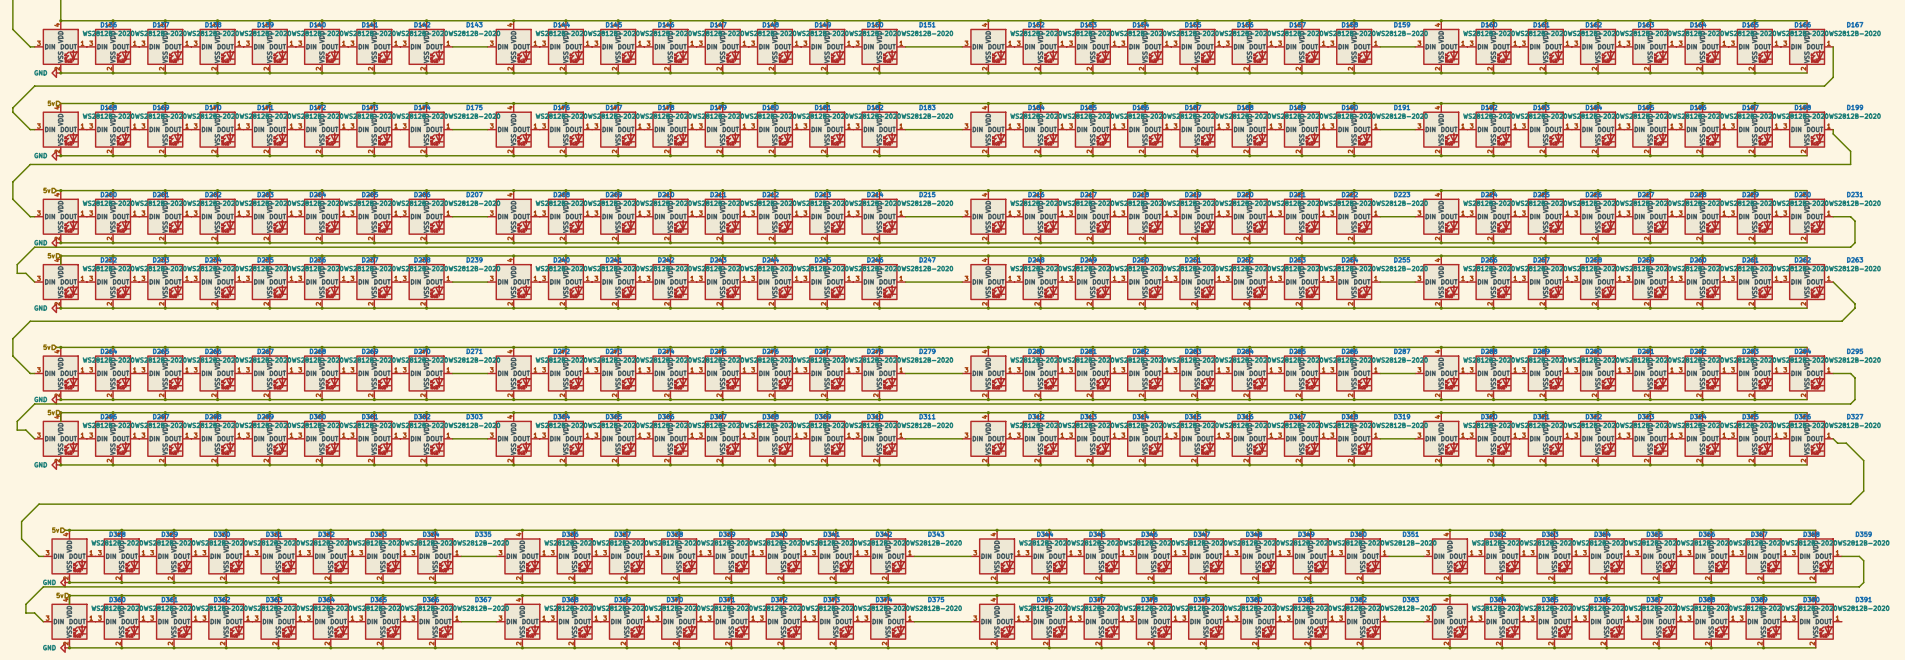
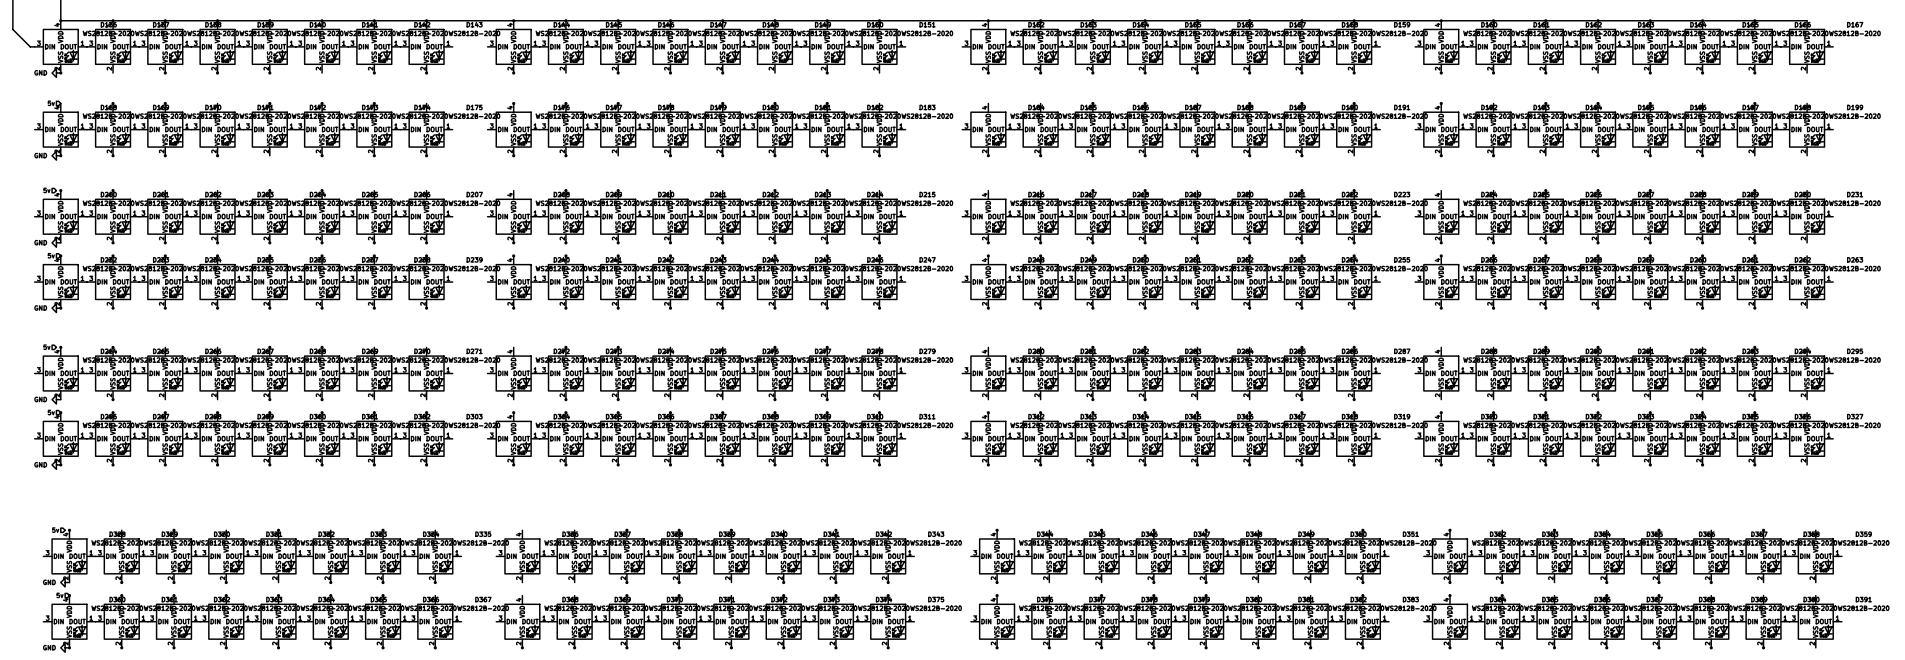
wire: (452, 46) (487, 46) -> none
wire: (905, 46) (962, 46) -> none
wire: (1380, 46) (1415, 46) -> none
wire: (1833, 46) (1833, 77) (1824, 86) (34, 86) (12, 107) (12, 112) (30, 129) (34, 129) -> none
wire: (60, 73) (1807, 73) -> none
junction: (879, 73) -> none
wire: (60, 103) (1807, 103) -> none
junction: (217, 103) -> none
junction: (426, 103) -> none
junction: (670, 103) -> none
junction: (879, 103) -> none
junction: (988, 103) -> none
junction: (1040, 103) -> none
junction: (1197, 103) -> none
junction: (1493, 103) -> none
junction: (1702, 103) -> none
wire: (452, 129) (487, 129) -> none
wire: (905, 129) (962, 129) -> none
wire: (1380, 129) (1415, 129) -> none
wire: (1833, 129) (1833, 133) (1850, 151) (1850, 164) (30, 164) (12, 181) (12, 199) (30, 216) (34, 216) -> none
wire: (60, 155) (1807, 155) -> none
junction: (269, 155) -> none
junction: (618, 155) -> none
junction: (1354, 155) -> none
junction: (1545, 155) -> none
junction: (1754, 155) -> none
wire: (56, 190) (1807, 190) -> none
junction: (165, 190) -> none
junction: (217, 190) -> none
junction: (374, 190) -> none
junction: (426, 190) -> none
junction: (513, 190) -> none
junction: (670, 190) -> none
junction: (722, 190) -> none
junction: (879, 190) -> none
junction: (988, 190) -> none
junction: (1040, 190) -> none
junction: (1197, 190) -> none
junction: (1249, 190) -> none
junction: (1441, 190) -> none
junction: (1493, 190) -> none
junction: (1702, 190) -> none
wire: (452, 216) (487, 216) -> none
wire: (905, 216) (962, 216) -> none
wire: (1380, 216) (1415, 216) -> none
wire: (1833, 216) (1850, 216) (1854, 221) (1854, 242) (1850, 247) (34, 247) (17, 264) (17, 273) (25, 273) (34, 282) -> none
wire: (60, 242) (1807, 242) -> none
junction: (60, 242) -> none
wire: (1807, 255) (60, 255) (60, 264) -> none
wire: (452, 282) (487, 282) -> none
wire: (905, 282) (962, 282) -> none
wire: (1380, 282) (1415, 282) -> none
wire: (1833, 282) (1854, 303) (1854, 308) (1841, 321) (30, 321) (12, 338) (12, 356) (30, 373) (34, 373) -> none
wire: (60, 308) (1807, 308) -> none
wire: (56, 347) (1807, 347) -> none
junction: (165, 347) -> none
junction: (217, 347) -> none
junction: (374, 347) -> none
junction: (426, 347) -> none
junction: (513, 347) -> none
junction: (670, 347) -> none
junction: (722, 347) -> none
junction: (879, 347) -> none
junction: (988, 347) -> none
junction: (1040, 347) -> none
junction: (1197, 347) -> none
junction: (1249, 347) -> none
junction: (1441, 347) -> none
junction: (1493, 347) -> none
junction: (1650, 347) -> none
junction: (1702, 347) -> none
wire: (452, 373) (487, 373) -> none
wire: (905, 373) (962, 373) -> none
wire: (1380, 373) (1415, 373) -> none
wire: (1833, 373) (1850, 373) (1854, 377) (1854, 399) (1850, 403) (34, 403) (17, 421) (17, 430) (25, 430) (34, 438) -> none
wire: (60, 399) (1807, 399) -> none
junction: (60, 399) -> none
junction: (165, 399) -> none
junction: (217, 399) -> none
junction: (374, 399) -> none
junction: (426, 399) -> none
junction: (513, 399) -> none
junction: (670, 399) -> none
junction: (722, 399) -> none
junction: (879, 399) -> none
junction: (988, 399) -> none
junction: (1040, 399) -> none
junction: (1197, 399) -> none
junction: (1249, 399) -> none
junction: (1441, 399) -> none
junction: (1493, 399) -> none
junction: (1650, 399) -> none
junction: (1702, 399) -> none
wire: (1807, 412) (60, 412) (60, 421) -> none
wire: (452, 438) (487, 438) -> none
wire: (905, 438) (962, 438) -> none
wire: (1380, 438) (1415, 438) -> none
wire: (1833, 438) (1837, 443) (1846, 443) (1863, 460) (1863, 491) (1850, 504) (39, 504) (21, 521) (21, 538) (39, 556) (43, 556) -> none
wire: (60, 464) (1807, 464) -> none
wire: (65, 530) (1815, 530) -> none
junction: (121, 530) -> none
junction: (226, 530) -> none
junction: (330, 530) -> none
junction: (435, 530) -> none
junction: (522, 530) -> none
junction: (574, 530) -> none
junction: (783, 530) -> none
junction: (888, 530) -> none
junction: (1049, 530) -> none
junction: (1258, 530) -> none
junction: (1310, 530) -> none
junction: (1502, 530) -> none
junction: (1606, 530) -> none
junction: (1711, 530) -> none
wire: (461, 556) (496, 556) -> none
wire: (914, 556) (970, 556) -> none
wire: (1389, 556) (1423, 556) -> none
wire: (1841, 556) (1859, 556) (1863, 560) (1863, 582) (1859, 586) (43, 586) (25, 604) (25, 613) (34, 613) (43, 621) -> none
wire: (69, 582) (1815, 582) -> none
junction: (69, 582) -> none
junction: (278, 582) -> none
junction: (522, 582) -> none
junction: (574, 582) -> none
junction: (731, 582) -> none
junction: (1049, 582) -> none
junction: (1101, 582) -> none
junction: (1258, 582) -> none
junction: (1310, 582) -> none
junction: (1554, 582) -> none
junction: (1763, 582) -> none
junction: (435, 595) -> none
junction: (522, 595) -> none
junction: (574, 595) -> none
junction: (731, 595) -> none
junction: (1049, 595) -> none
junction: (1258, 595) -> none
junction: (1310, 595) -> none
junction: (1554, 595) -> none
junction: (1711, 595) -> none
junction: (1763, 595) -> none
wire: (1815, 595) (69, 595) (69, 604) -> none
wire: (461, 621) (496, 621) -> none
wire: (914, 621) (970, 621) -> none
wire: (1389, 621) (1423, 621) -> none
wire: (69, 647) (1815, 647) -> none

